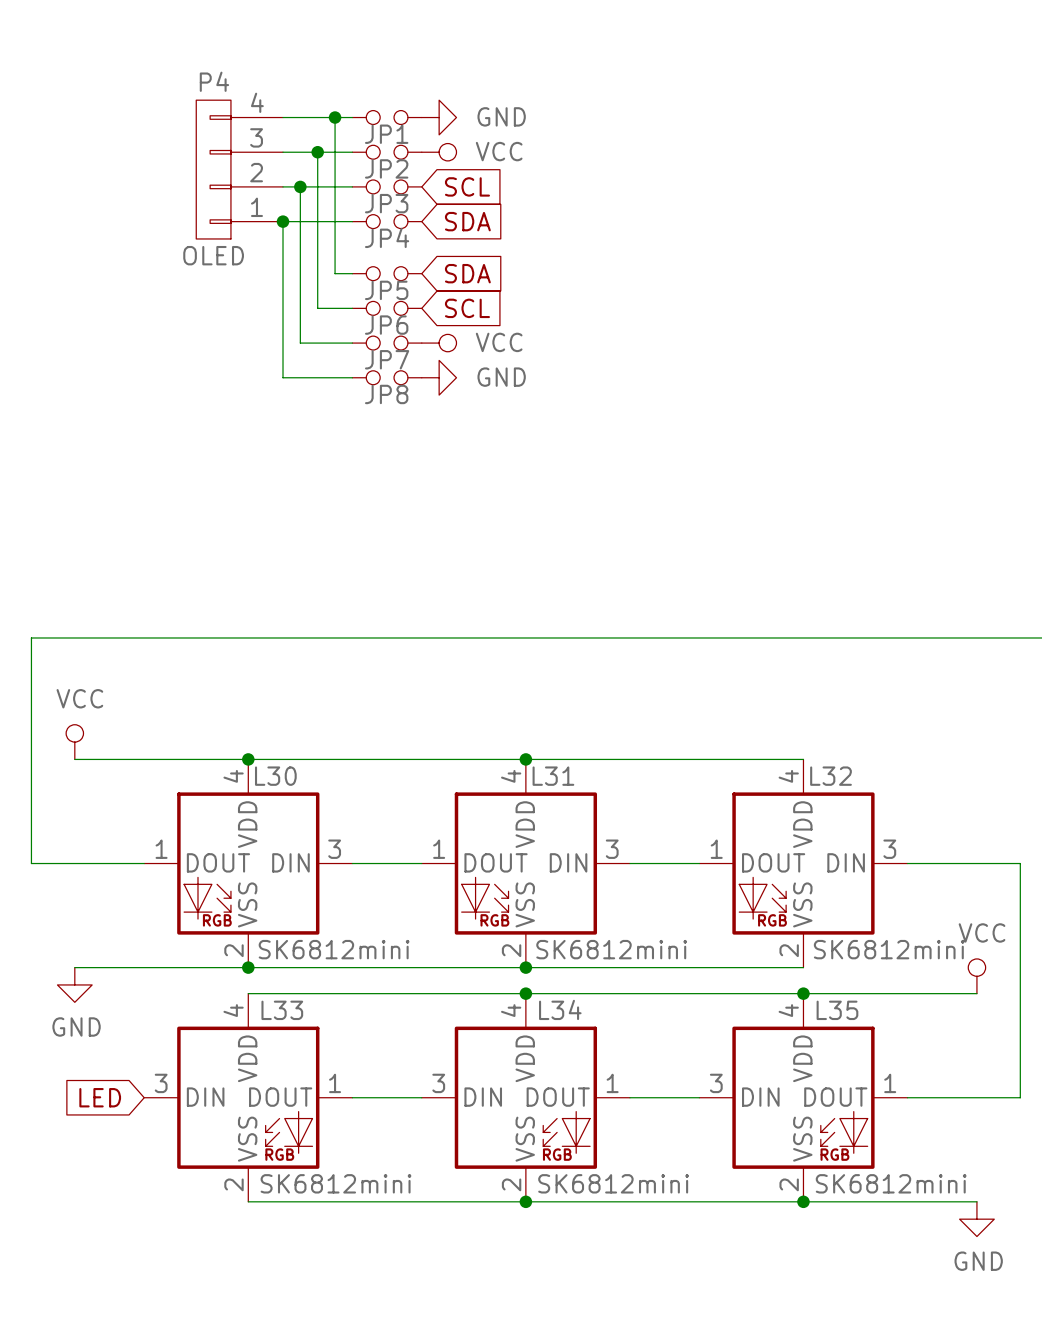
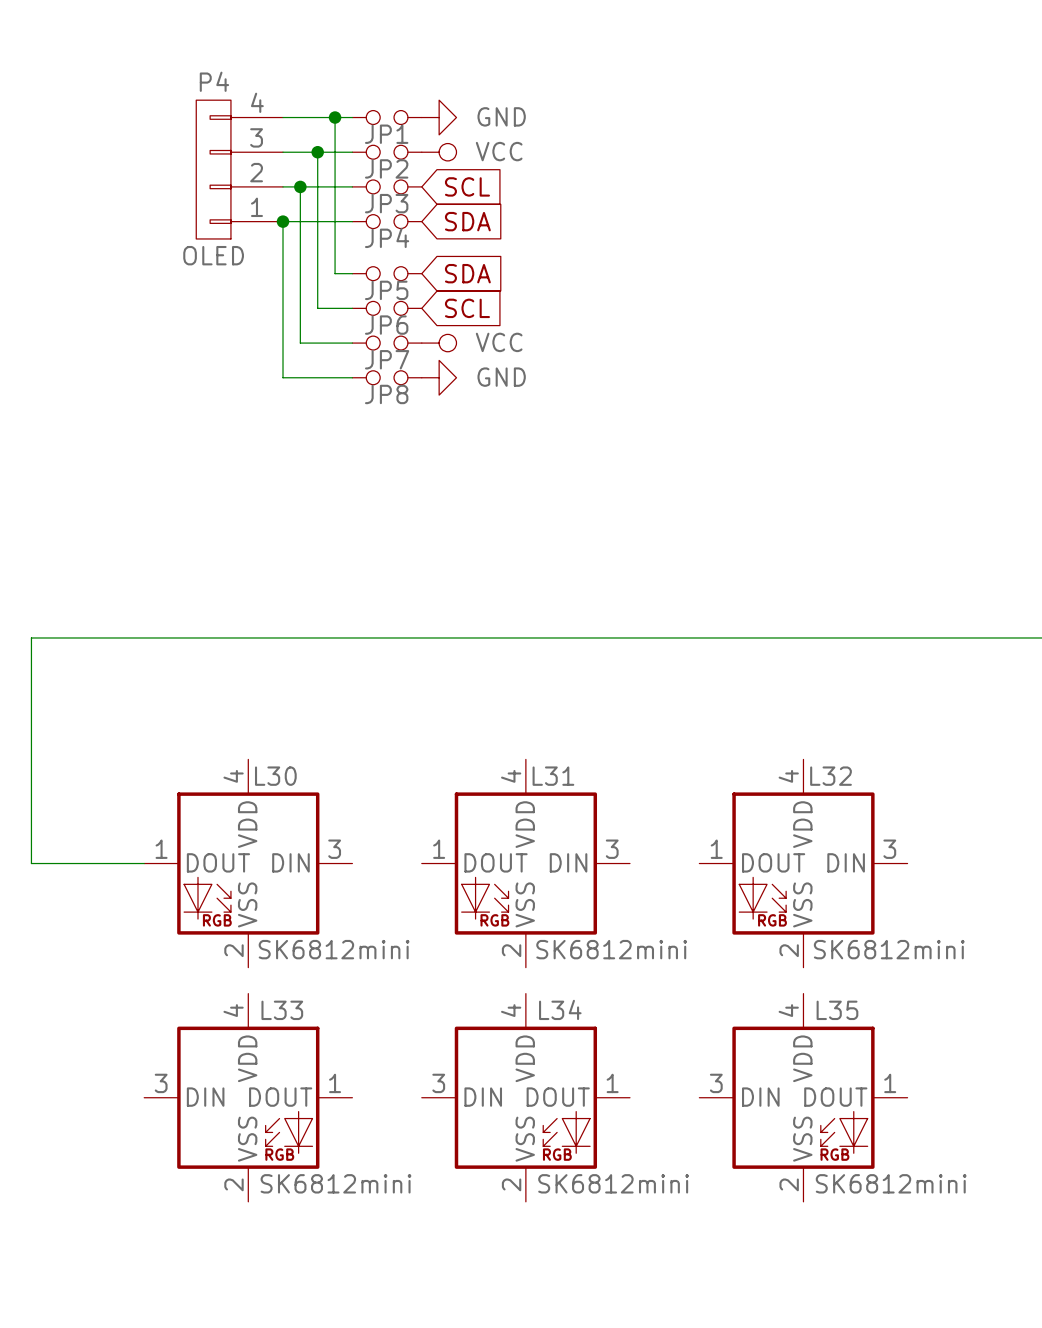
power symbol: VCC (74, 742) -> none
wire: (74, 759) (803, 759) -> none
junction: (248, 759) -> none
junction: (525, 759) -> none
wire: (352, 863) (421, 863) -> none
wire: (629, 863) (699, 863) -> none
wire: (907, 863) (1020, 863) (1020, 1097) (907, 1097) -> none
wire: (74, 967) (803, 967) -> none
junction: (248, 967) -> none
junction: (525, 967) -> none
power symbol: VCC (976, 976) -> none
power symbol: GND (74, 984) -> none
wire: (248, 993) (976, 993) -> none
junction: (525, 993) -> none
junction: (803, 993) -> none
global label: LED (100, 1097) -> none
wire: (352, 1097) (421, 1097) -> none
wire: (629, 1097) (699, 1097) -> none
wire: (248, 1201) (976, 1201) -> none
junction: (525, 1201) -> none
junction: (803, 1201) -> none
power symbol: GND (976, 1219) -> none

